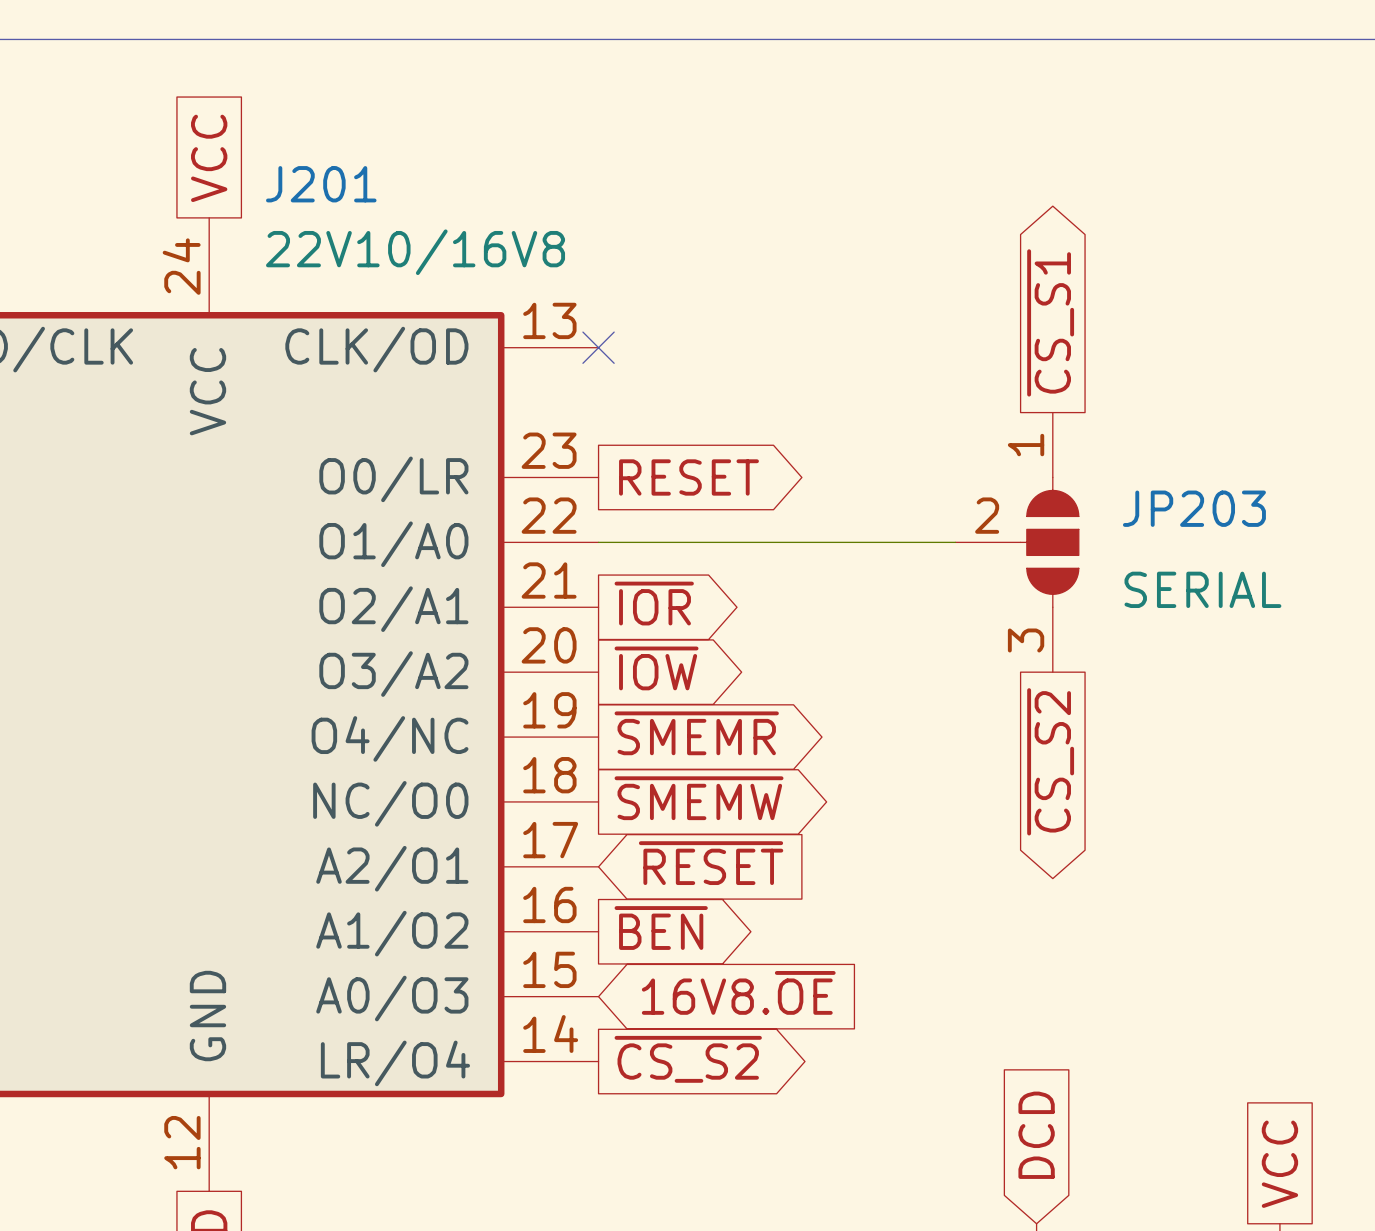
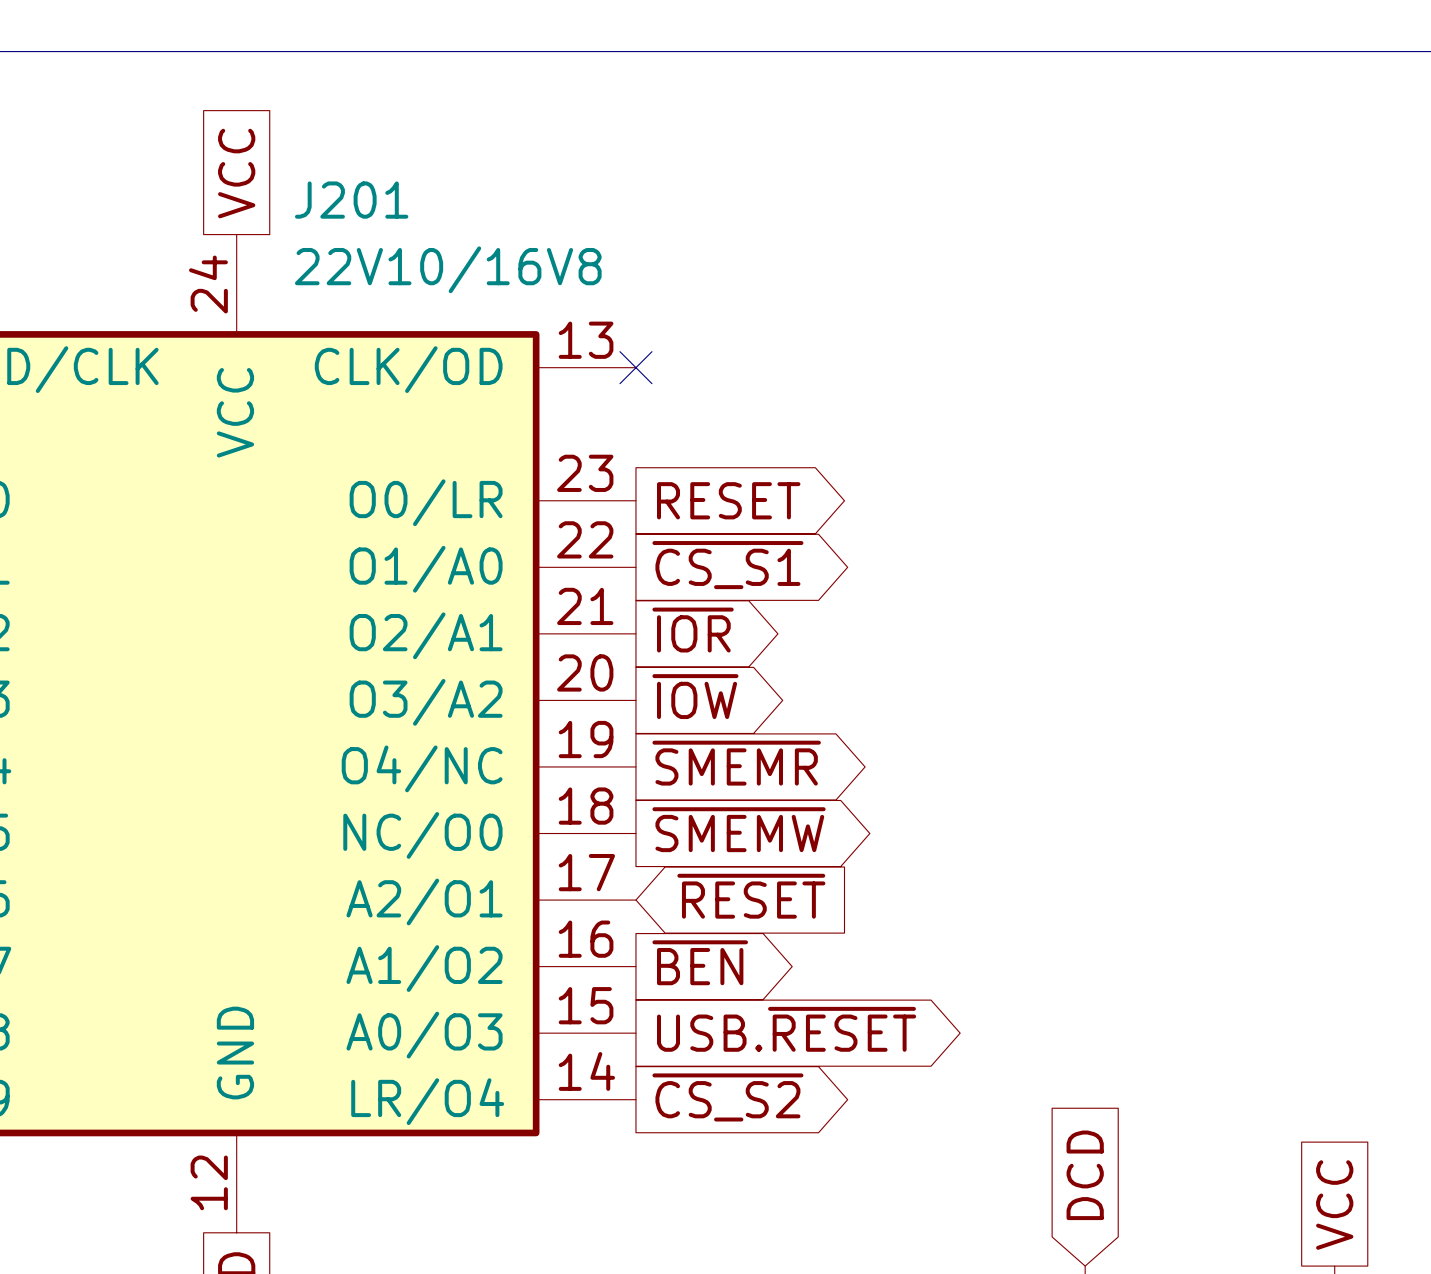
global label rotation: 0° (1050, 322) -> 90° clockwise (727, 565)
global label position: ~{CS_S1} (1050, 322) -> ~{CS_S1} (727, 565)
wire: (598, 542) (955, 542) -> none
JP203: SERIAL (1017, 542) -> none
global label: ~{CS_S2} (1050, 761) -> none
global label shape: input (738, 992) -> output (786, 1029)
global label: 16V8.~{OE} (738, 992) -> USB.~{RESET} (786, 1029)

